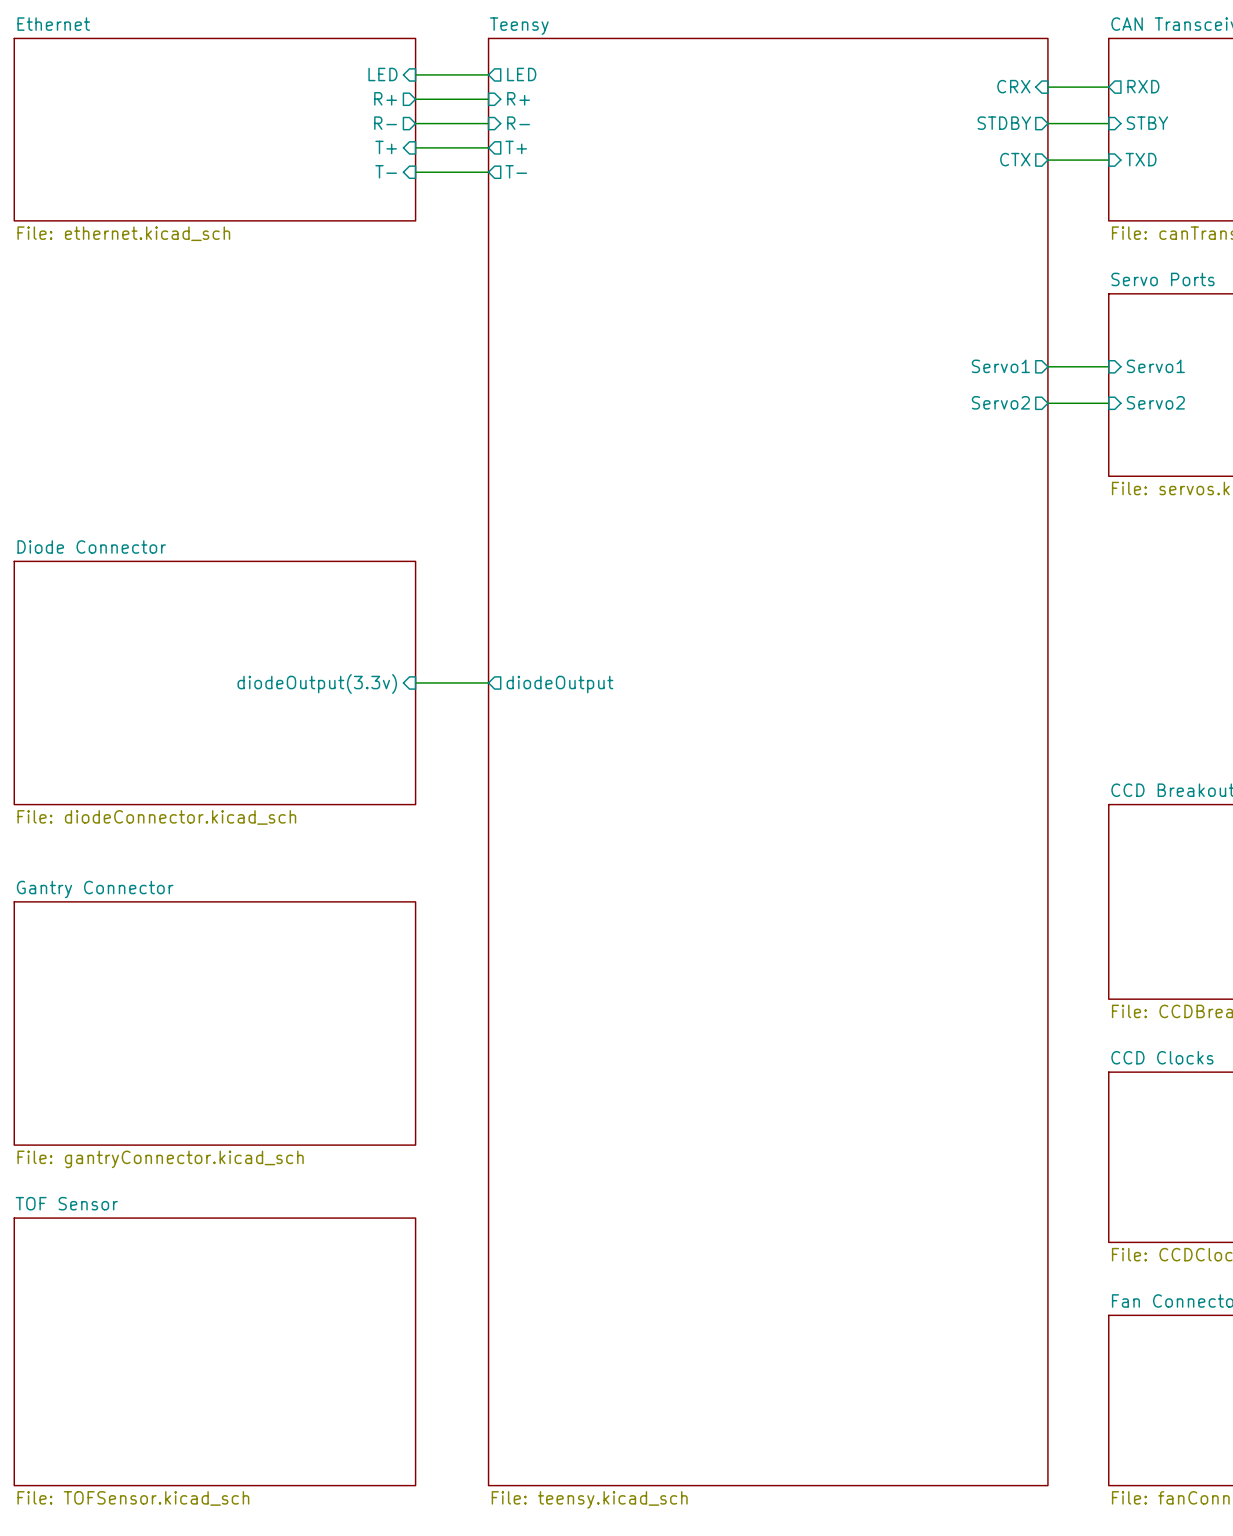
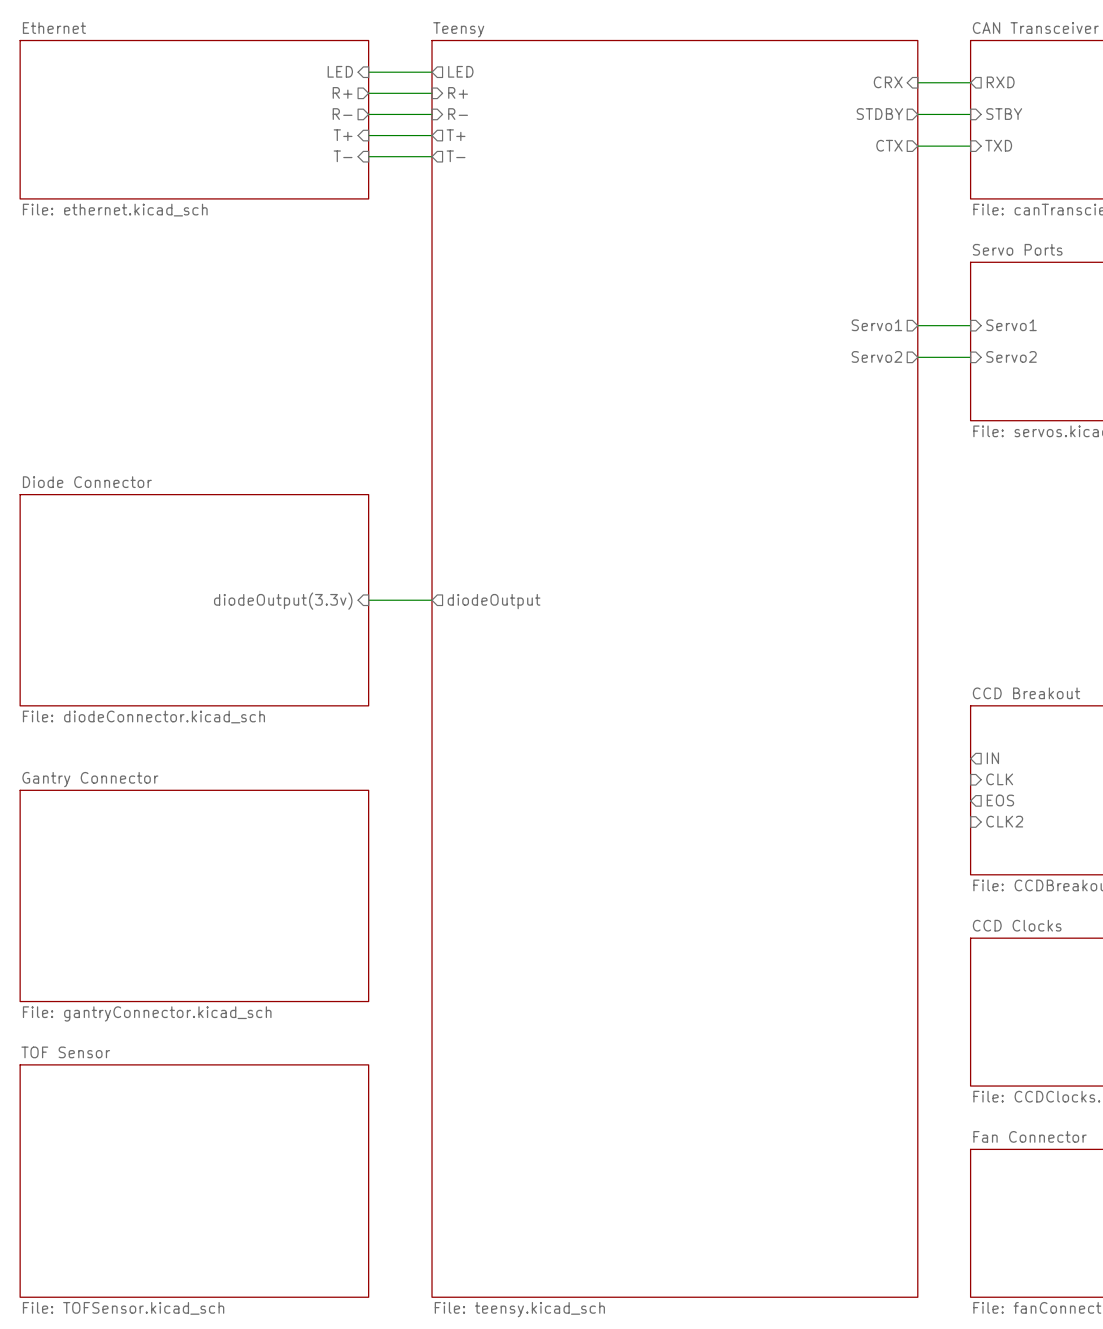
sheet pin: none -> IN (992, 758)
sheet pin: none -> CLK (999, 779)
sheet pin: none -> EOS (1000, 800)
sheet pin: none -> CLK2 (1004, 821)

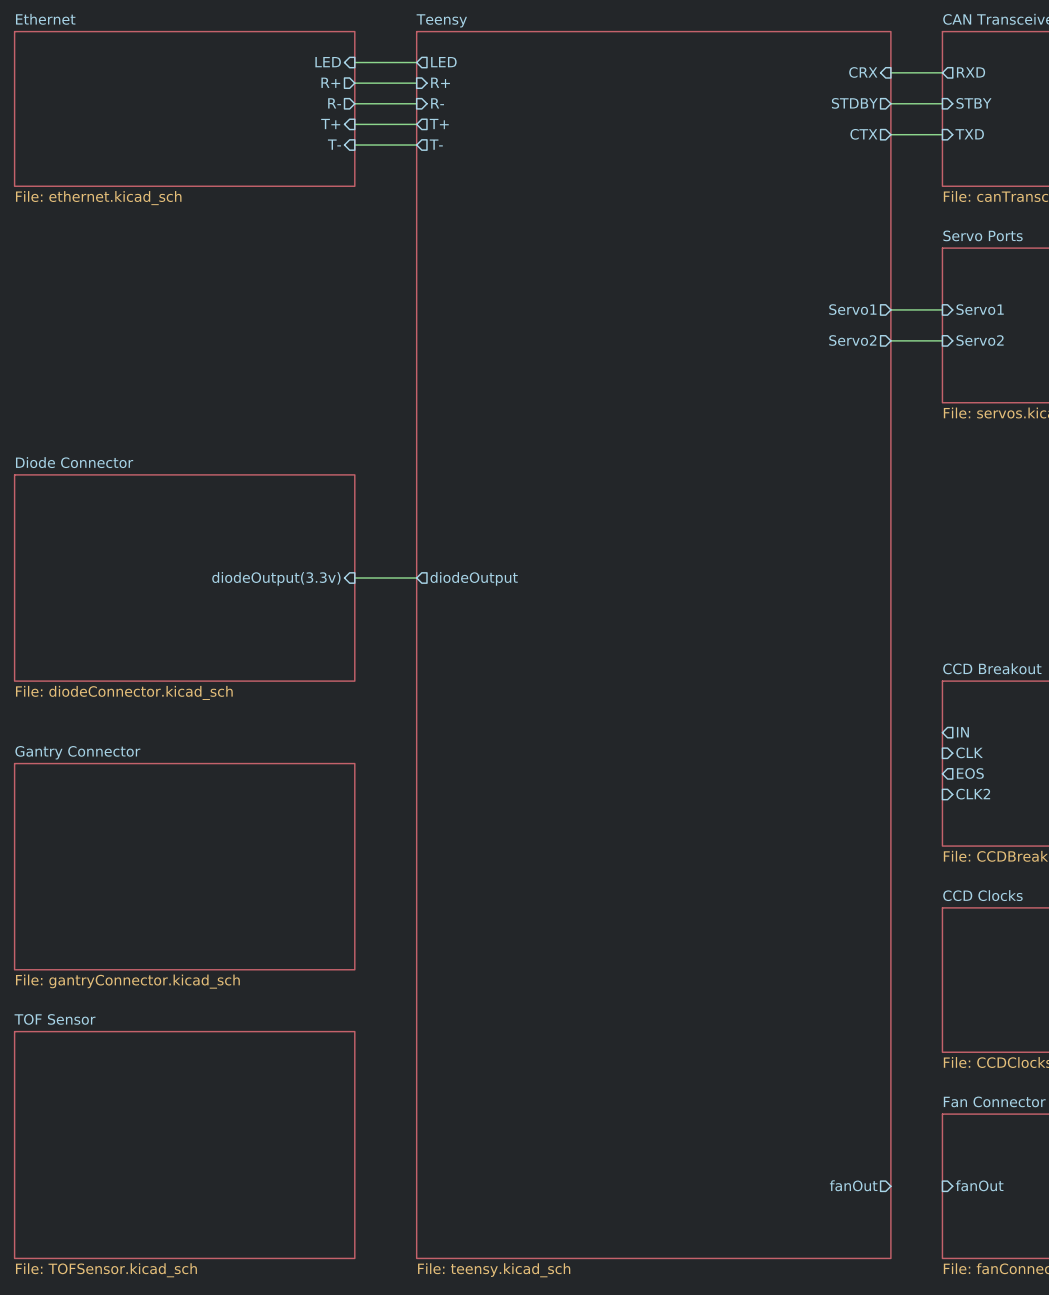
sheet pin: none -> fanOut (853, 1185)
sheet pin: none -> fanOut (979, 1185)

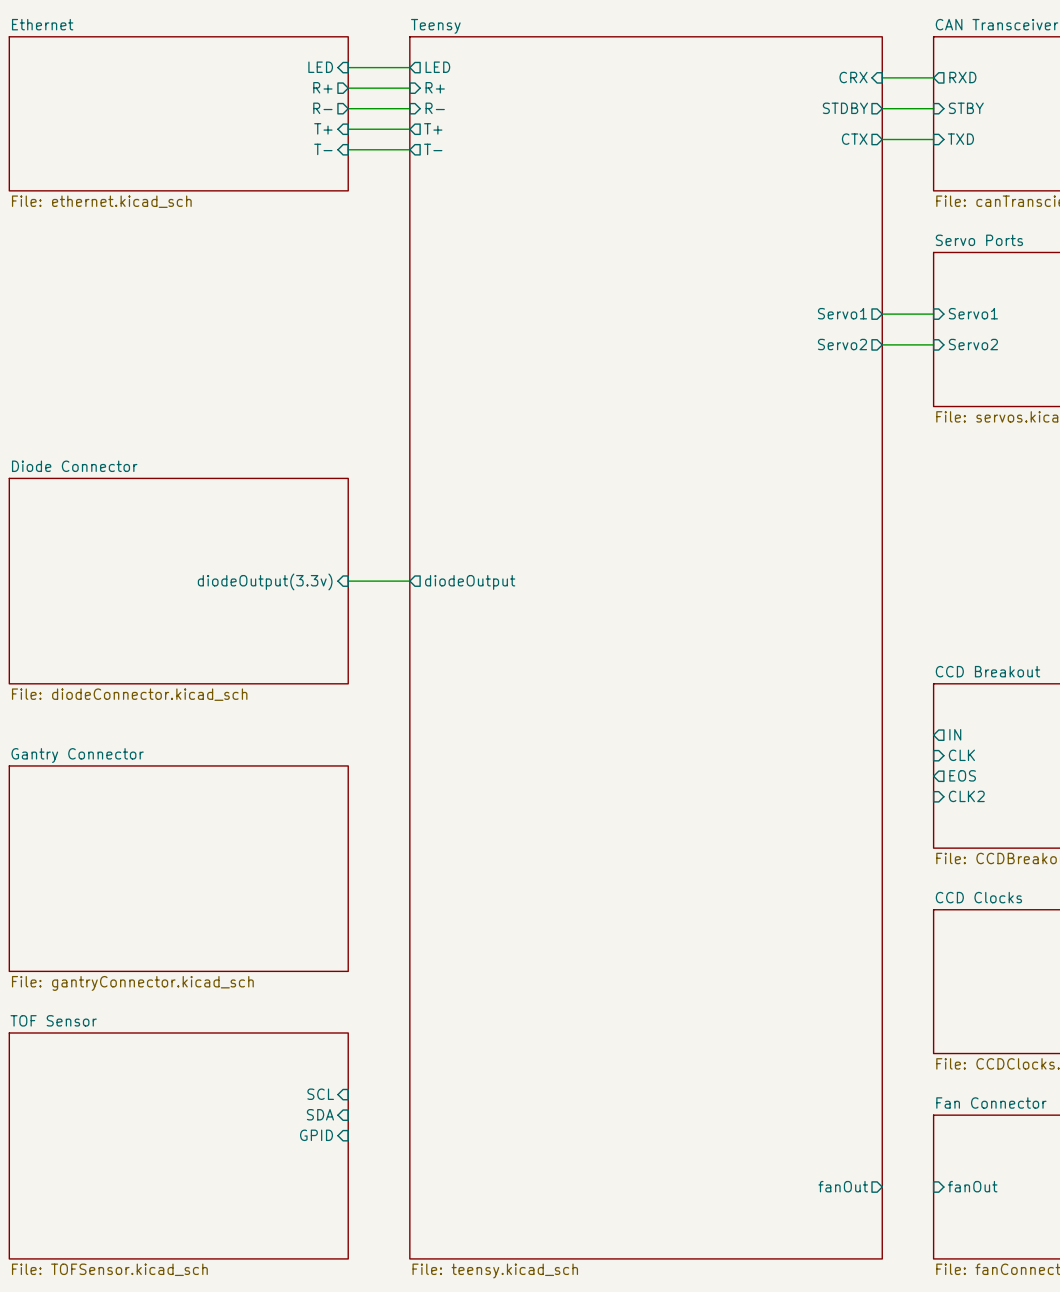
sheet pin: none -> SCL (320, 1094)
sheet pin: none -> SDA (320, 1114)
sheet pin: none -> GPID (316, 1135)

